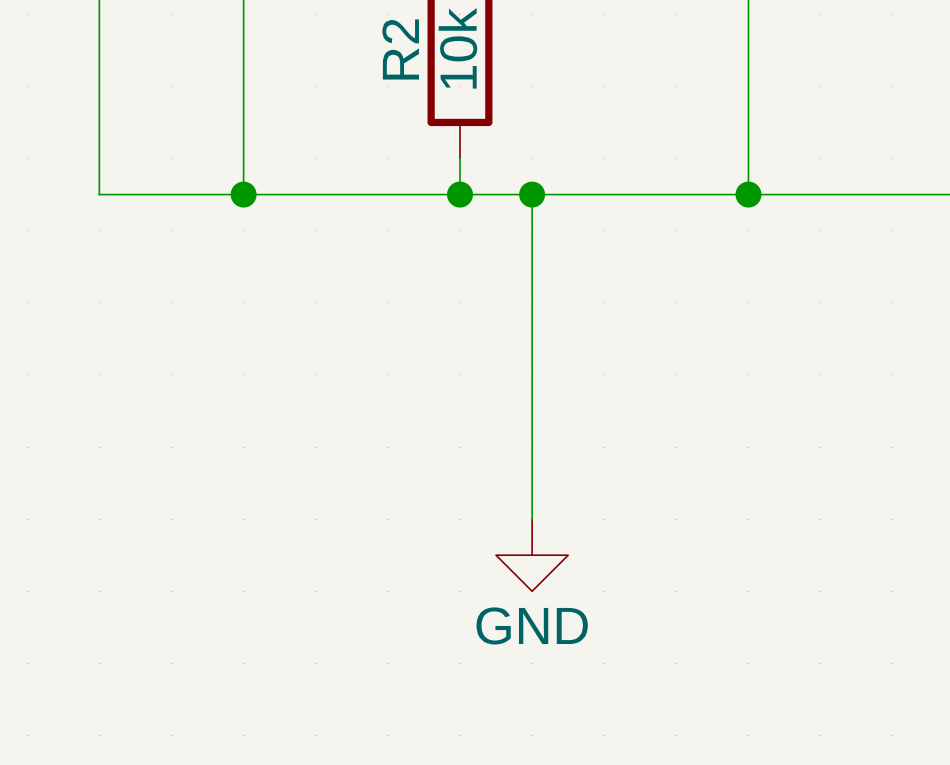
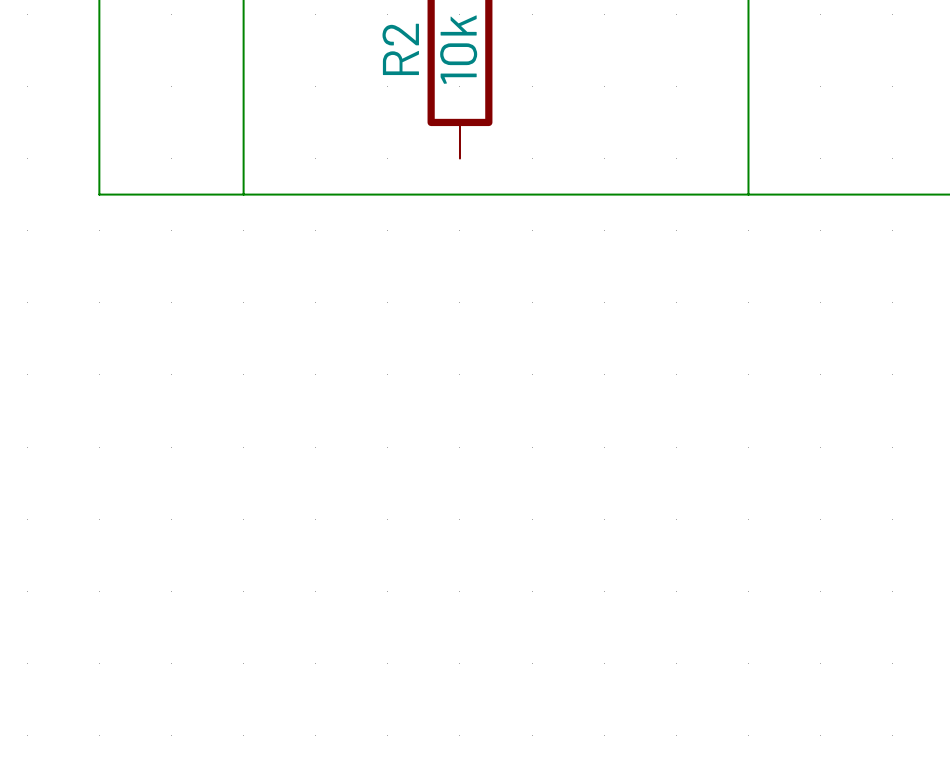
wire: (459, 158) (459, 194) -> none
junction: (243, 194) -> none
junction: (459, 194) -> none
wire: (532, 194) (532, 519) -> none
junction: (532, 194) -> none
junction: (748, 194) -> none
power symbol: GND (532, 555) -> none

